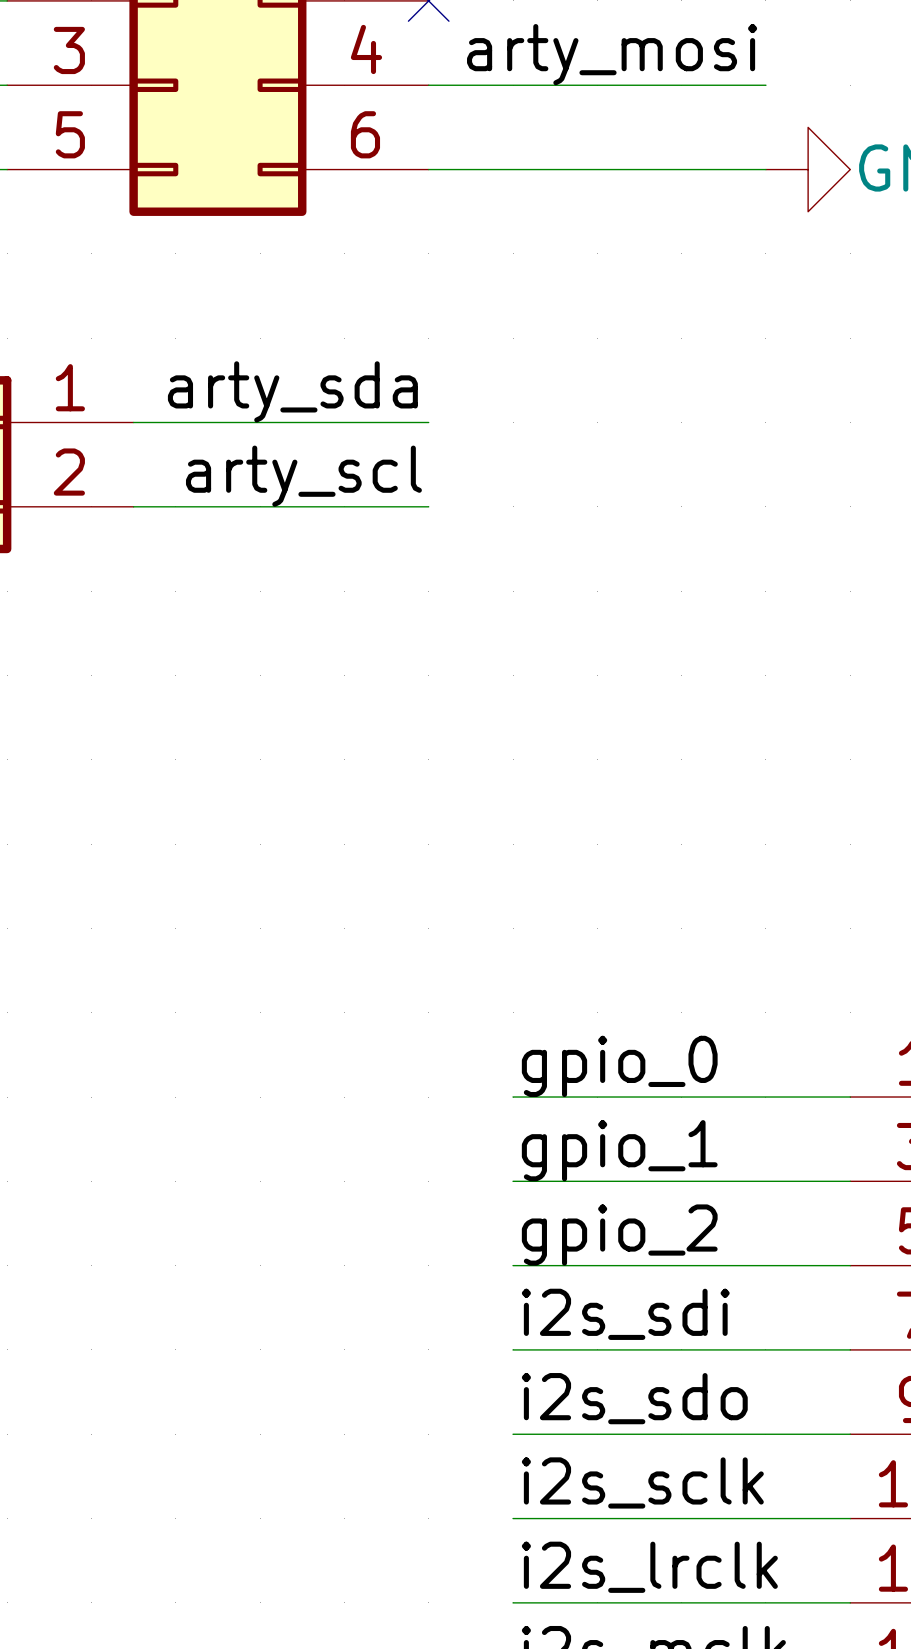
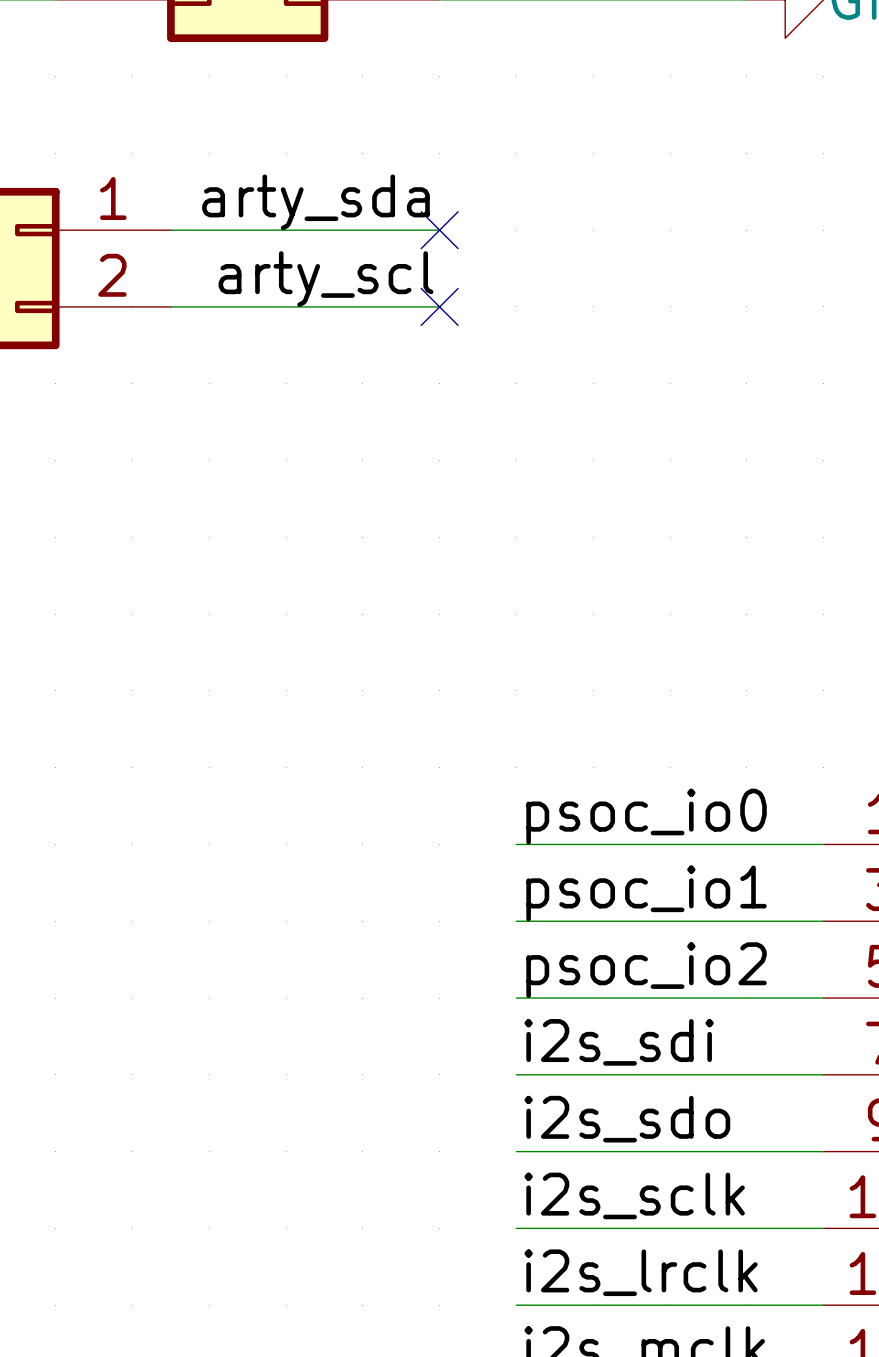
no-connect mark: none -> (439, 230)
no-connect mark: none -> (439, 306)
label: gpio_0 (619, 1066) -> psoc_io0 (646, 816)
label: gpio_1 (619, 1150) -> psoc_io1 (646, 893)
label: gpio_2 (619, 1235) -> psoc_io2 (646, 970)

